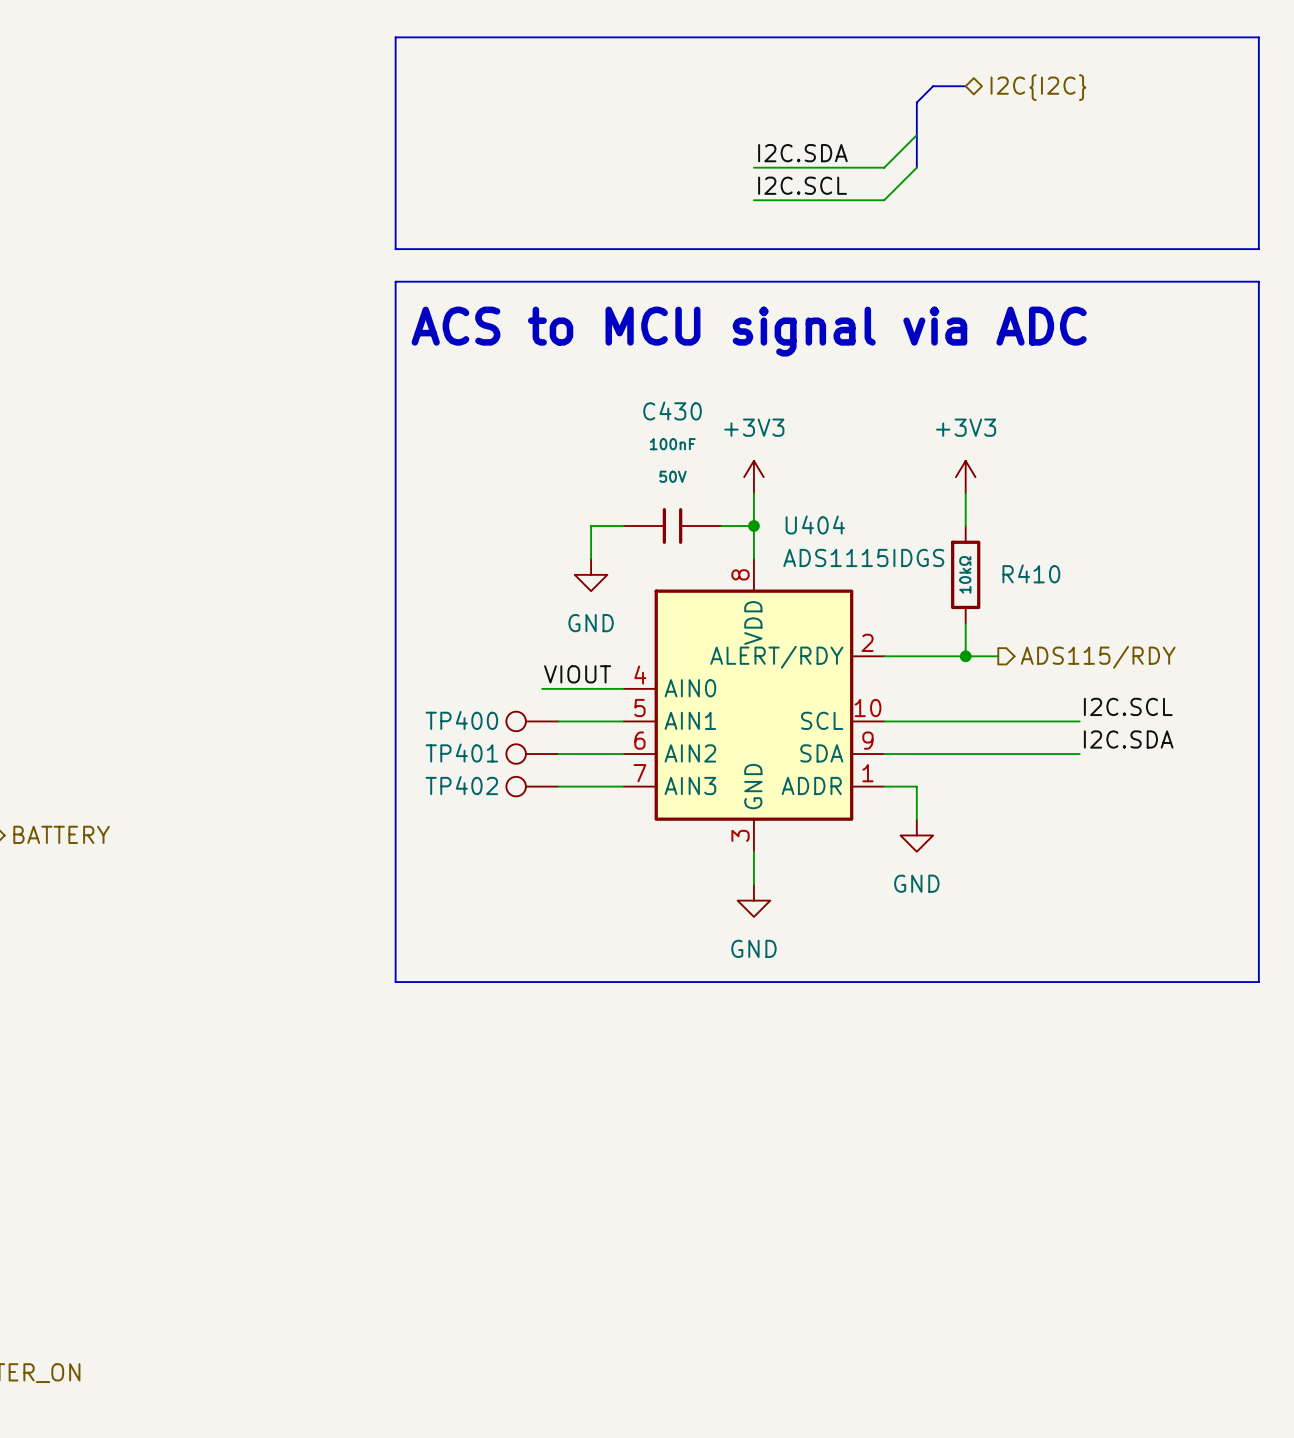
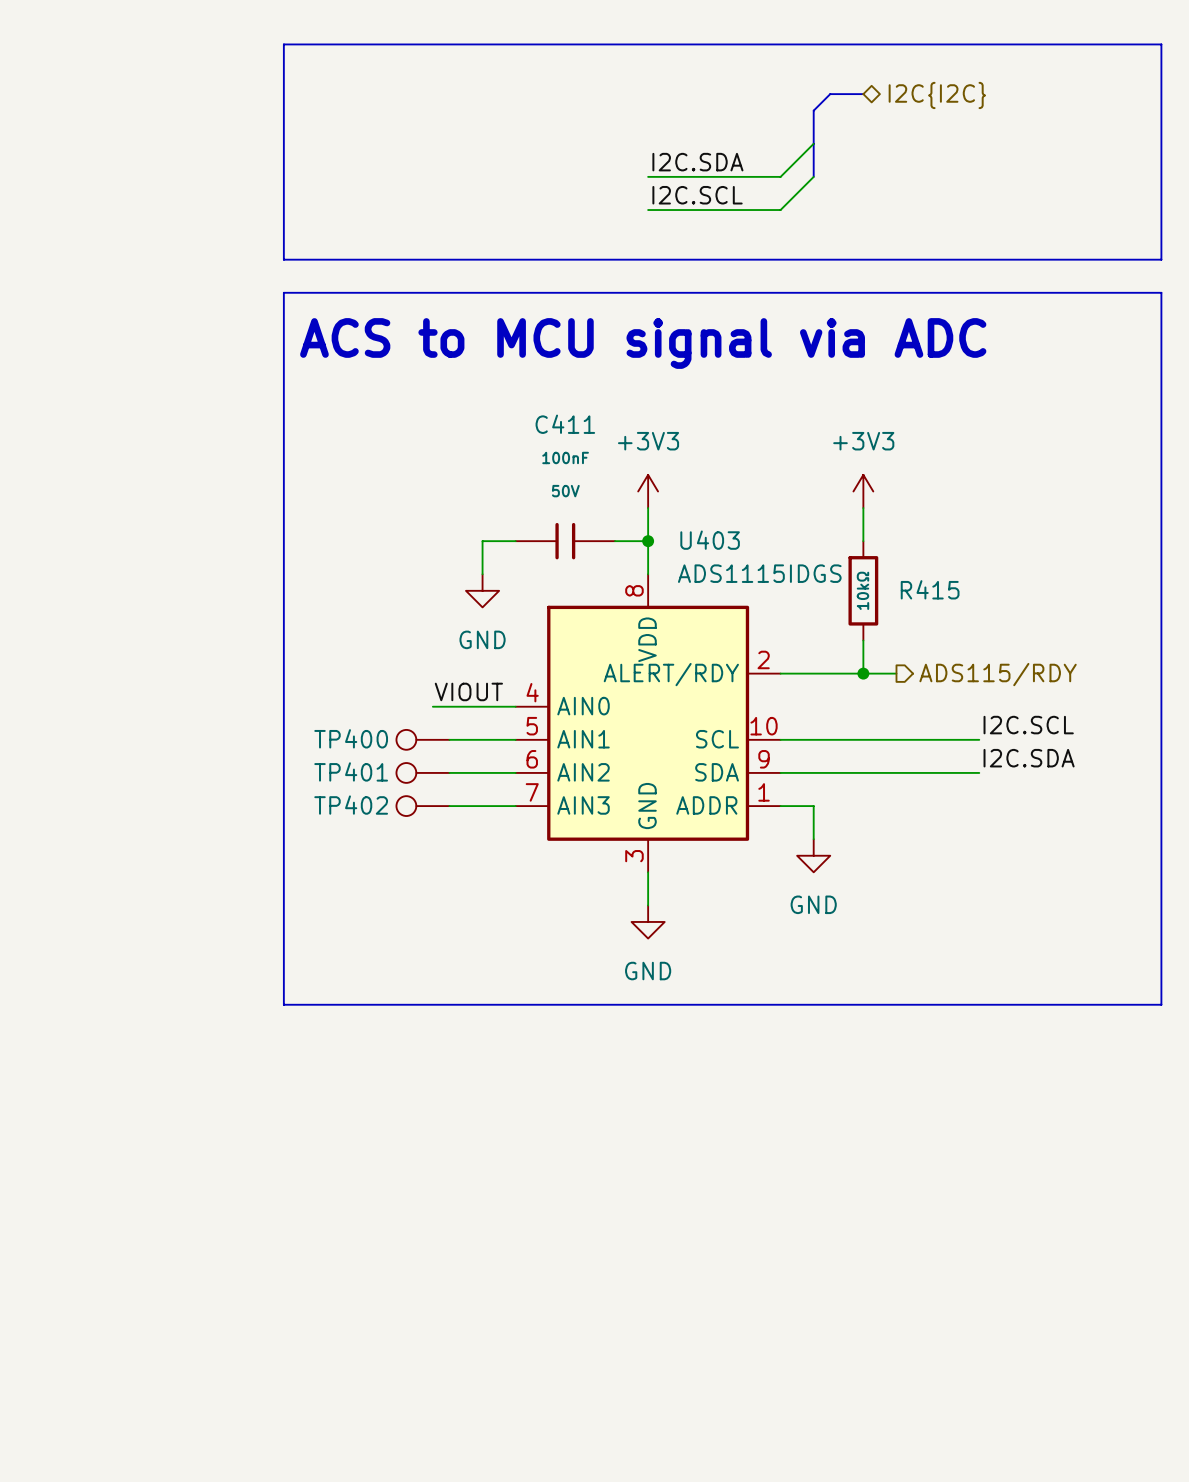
C430 name: C430 (672, 411) -> C411 (565, 424)
U404 name: U404 (815, 525) -> U403 (710, 540)
R410 name: R410 (1031, 573) -> R415 (930, 589)

